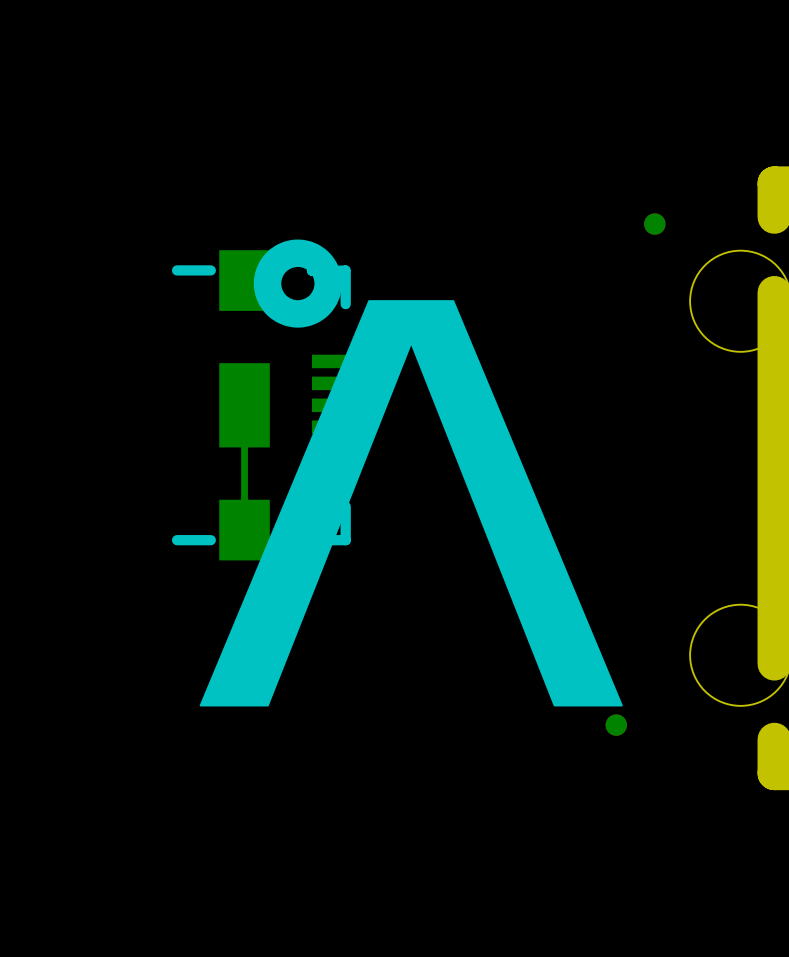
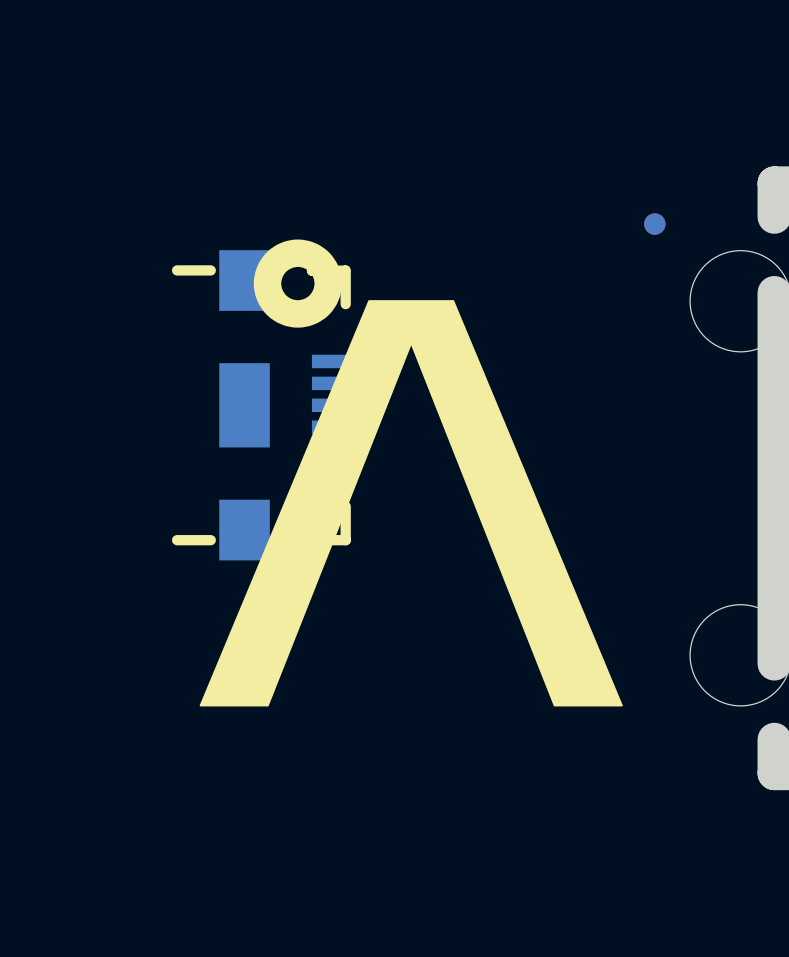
bottom track: (244, 405) (244, 530) -> none
part: (616, 725) -> none

